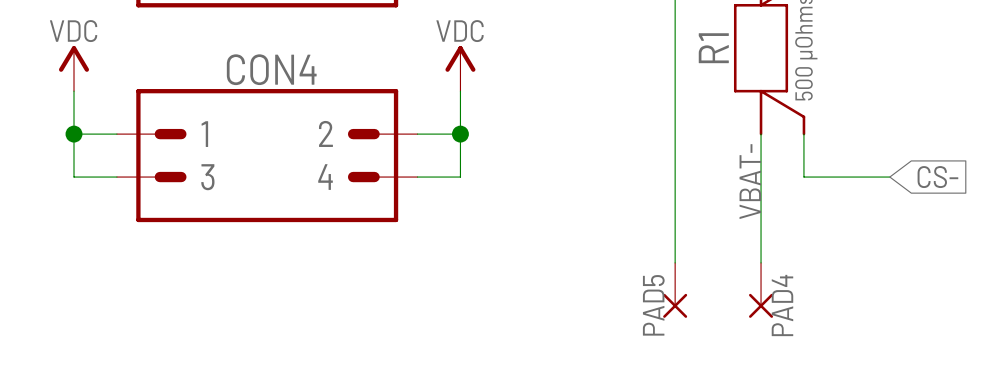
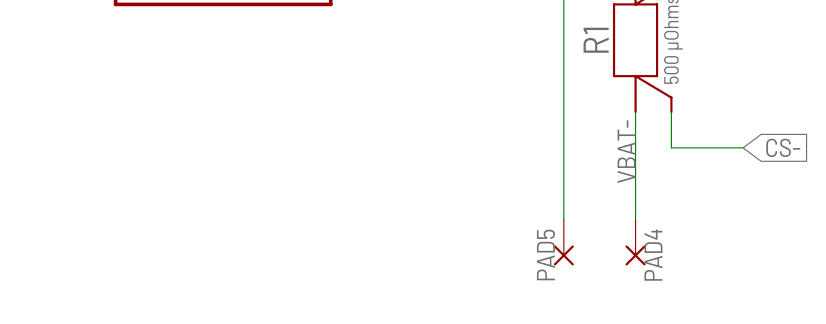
power symbol: VDC (74, 68) -> none
power symbol: VDC (460, 68) -> none
wire: (74, 91) (74, 177) (116, 177) -> none
wire: (460, 91) (460, 177) (417, 177) -> none
wire: (74, 134) (116, 134) -> none
junction: (74, 134) -> none
wire: (417, 134) (460, 134) -> none
junction: (460, 134) -> none
CON4: (267, 155) -> none

